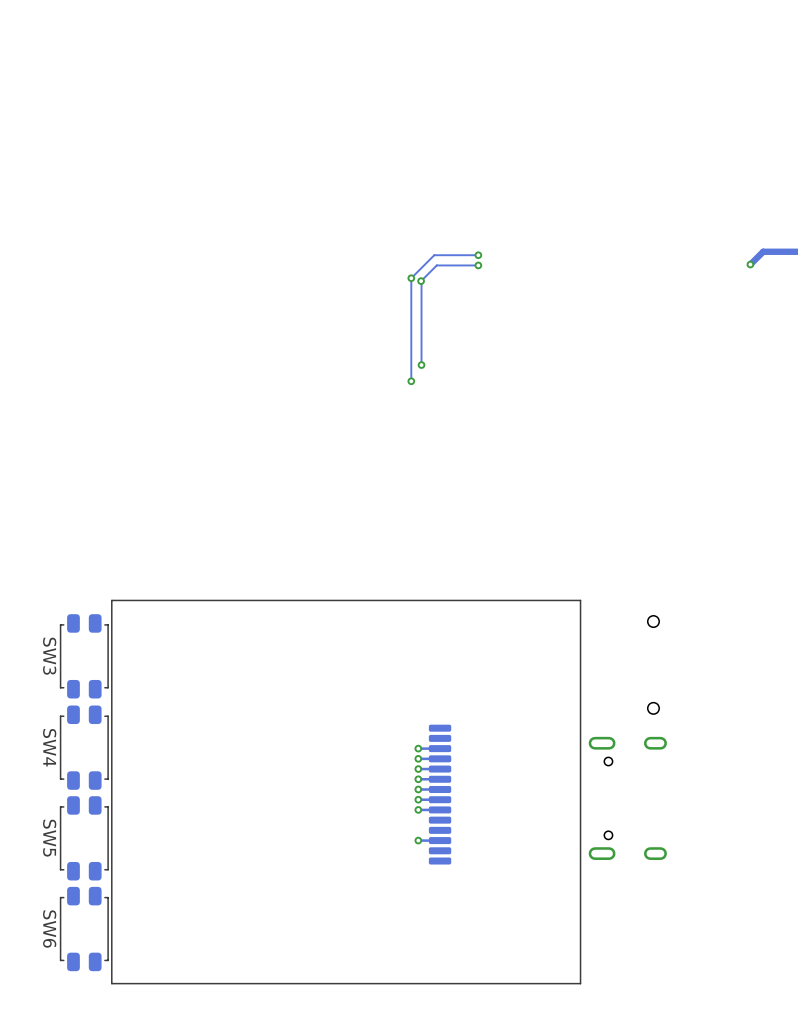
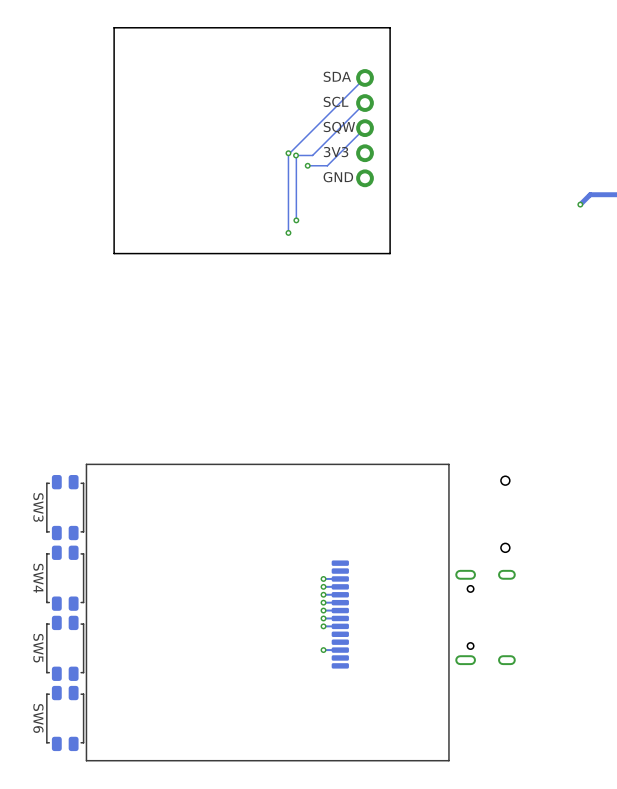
board edge: none -> (390, 27) (114, 27) (114, 253) (390, 253) (390, 27)
text: none -> SDA (337, 76)
track: none -> (365, 77) (288, 153) (288, 232)
via: none -> (365, 77)
text: none -> SCL (336, 101)
track: none -> (365, 103) (312, 155) (296, 155) (296, 220)
via: none -> (365, 103)
text: none -> SQW (339, 127)
track: none -> (365, 128) (327, 165) (307, 165)
via: none -> (365, 128)
text: none -> 3V3 (336, 152)
via: none -> (288, 153)
via: none -> (365, 153)
via: none -> (296, 155)
via: none -> (307, 165)
text: none -> GND (338, 177)
via: none -> (365, 178)
track: (478, 255) (434, 255) (411, 278) (411, 381) -> none
via: (478, 255) -> none
track: (478, 265) (436, 265) (421, 281) (421, 365) -> none
via: (478, 265) -> none
via: (411, 278) -> none
via: (421, 281) -> none
via: none -> (296, 220)
via: none -> (288, 232)
via: (421, 365) -> none
via: (411, 381) -> none

